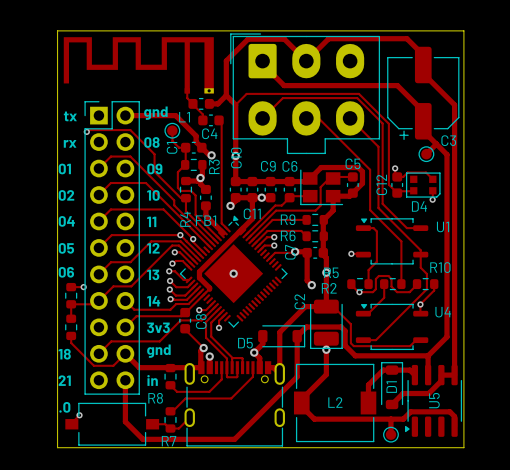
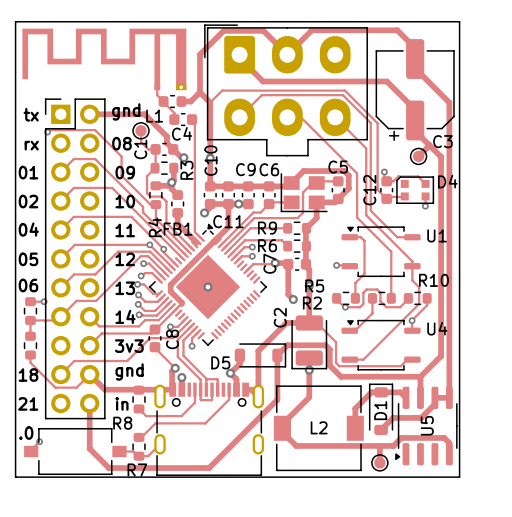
D4 rotation: 0° (423, 185) -> 180° (415, 190)
D4 name position: D4 (419, 206) -> D4 (447, 181)

